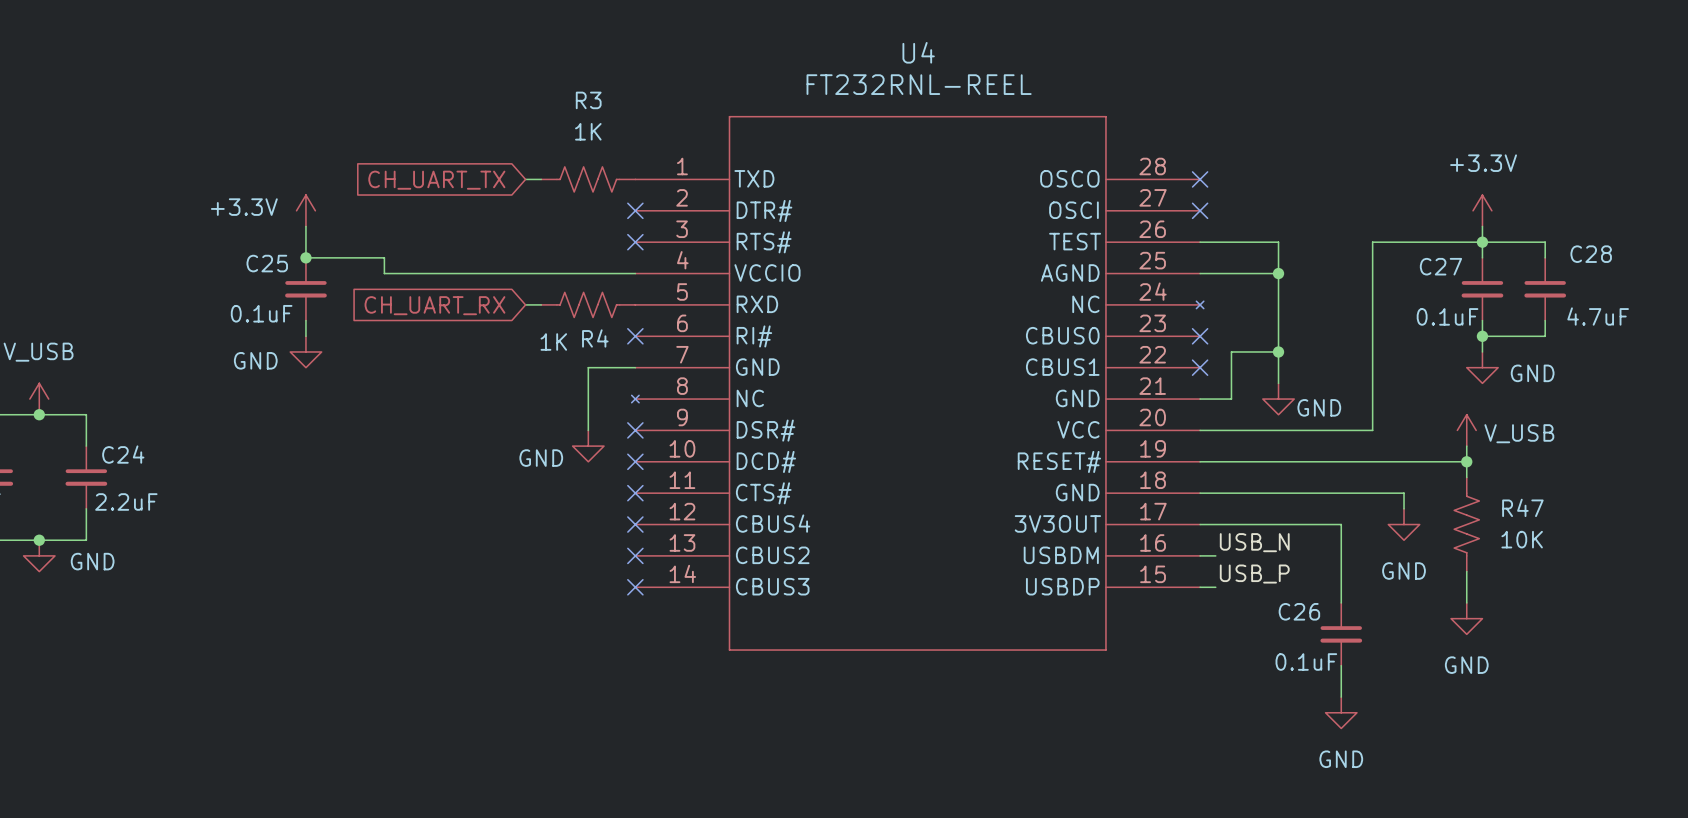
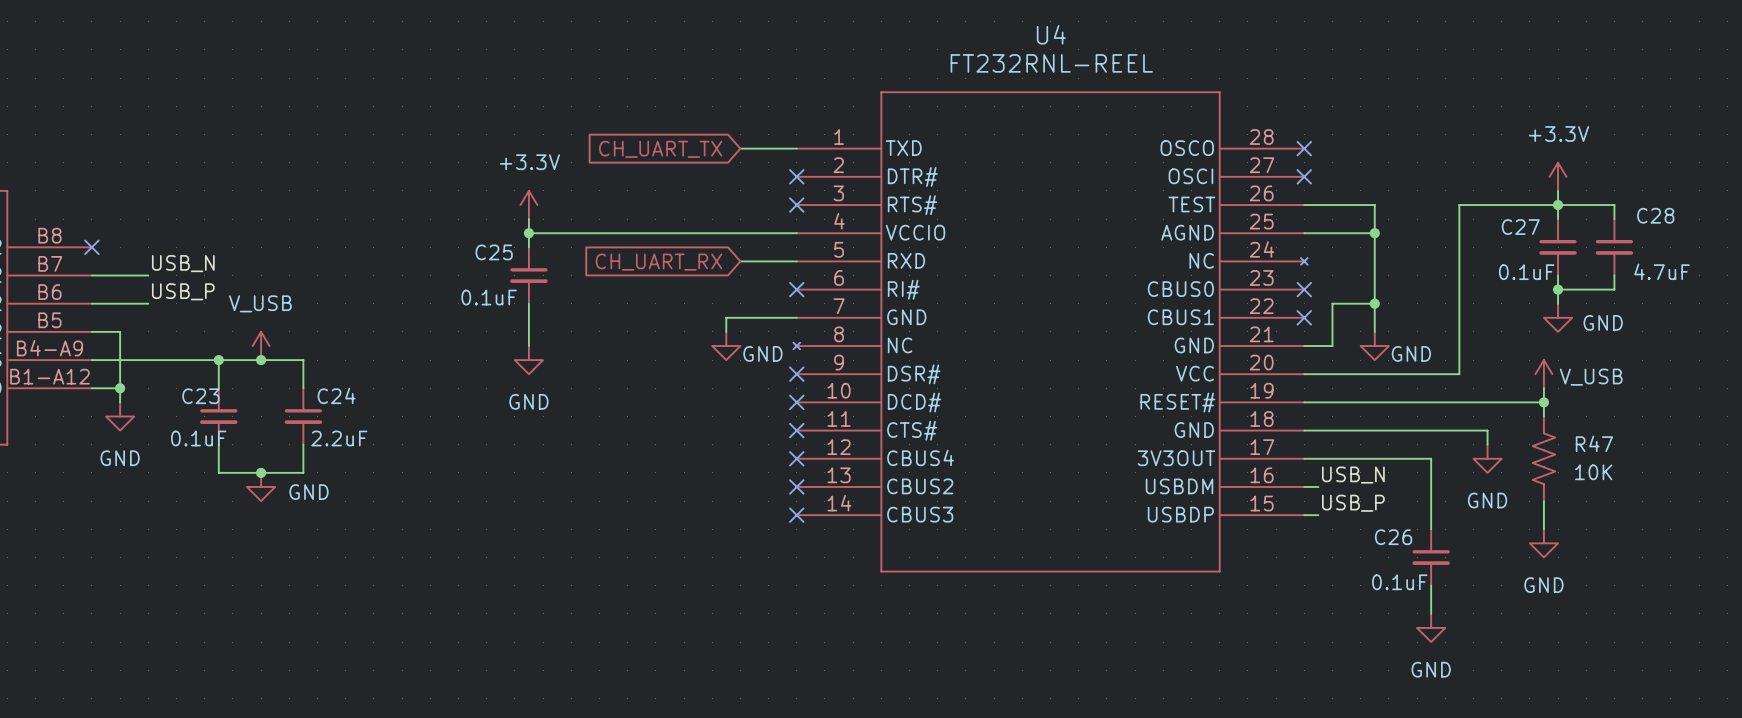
wire: (525, 179) (541, 179) -> none
wire: none -> (740, 148) (796, 148)
R3: 1K (588, 179) -> none
global label position: CH_UART_TX (436, 180) -> CH_UART_TX (660, 149)
power symbol text position: +3.3V (244, 207) -> +3.3V (529, 162)
power symbol position: +3.3V (305, 210) -> +3.3V (528, 205)
wire: (305, 226) (305, 257) (384, 257) (384, 273) -> (528, 233) (571, 233)
junction position: (305, 257) -> (528, 233)
wire: none -> (528, 219) (528, 247)
C25 position: (305, 289) -> (528, 275)
wire: none -> (740, 261) (796, 261)
R4: 1K (588, 304) -> none
global label position: CH_UART_RX (434, 305) -> CH_UART_RX (658, 262)
wire: (305, 320) (305, 336) -> none
power symbol position: GND (305, 351) -> GND (528, 360)
wire: none -> (528, 303) (528, 345)
power symbol text position: GND (255, 360) -> GND (528, 401)
wire: (588, 367) (588, 430) -> (754, 317) (726, 317) (726, 331)
power symbol position: GND (588, 446) -> GND (726, 345)
power symbol text position: GND (541, 458) -> GND (762, 353)

